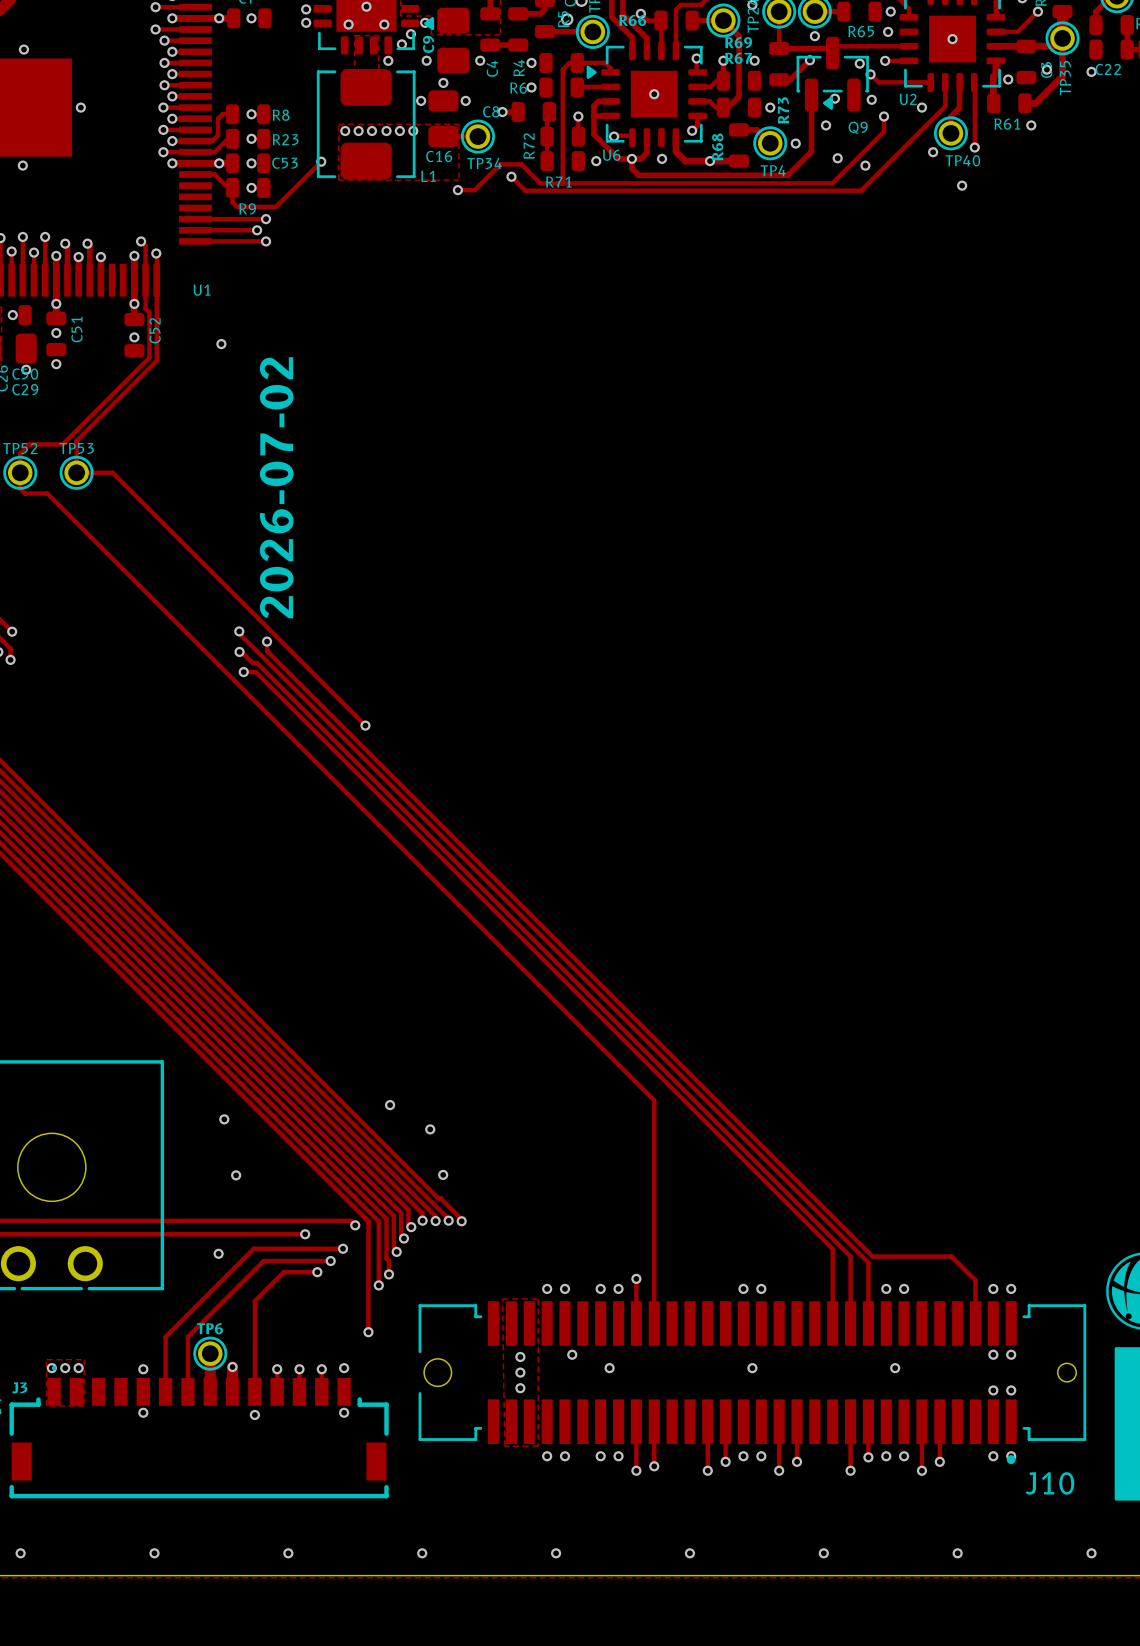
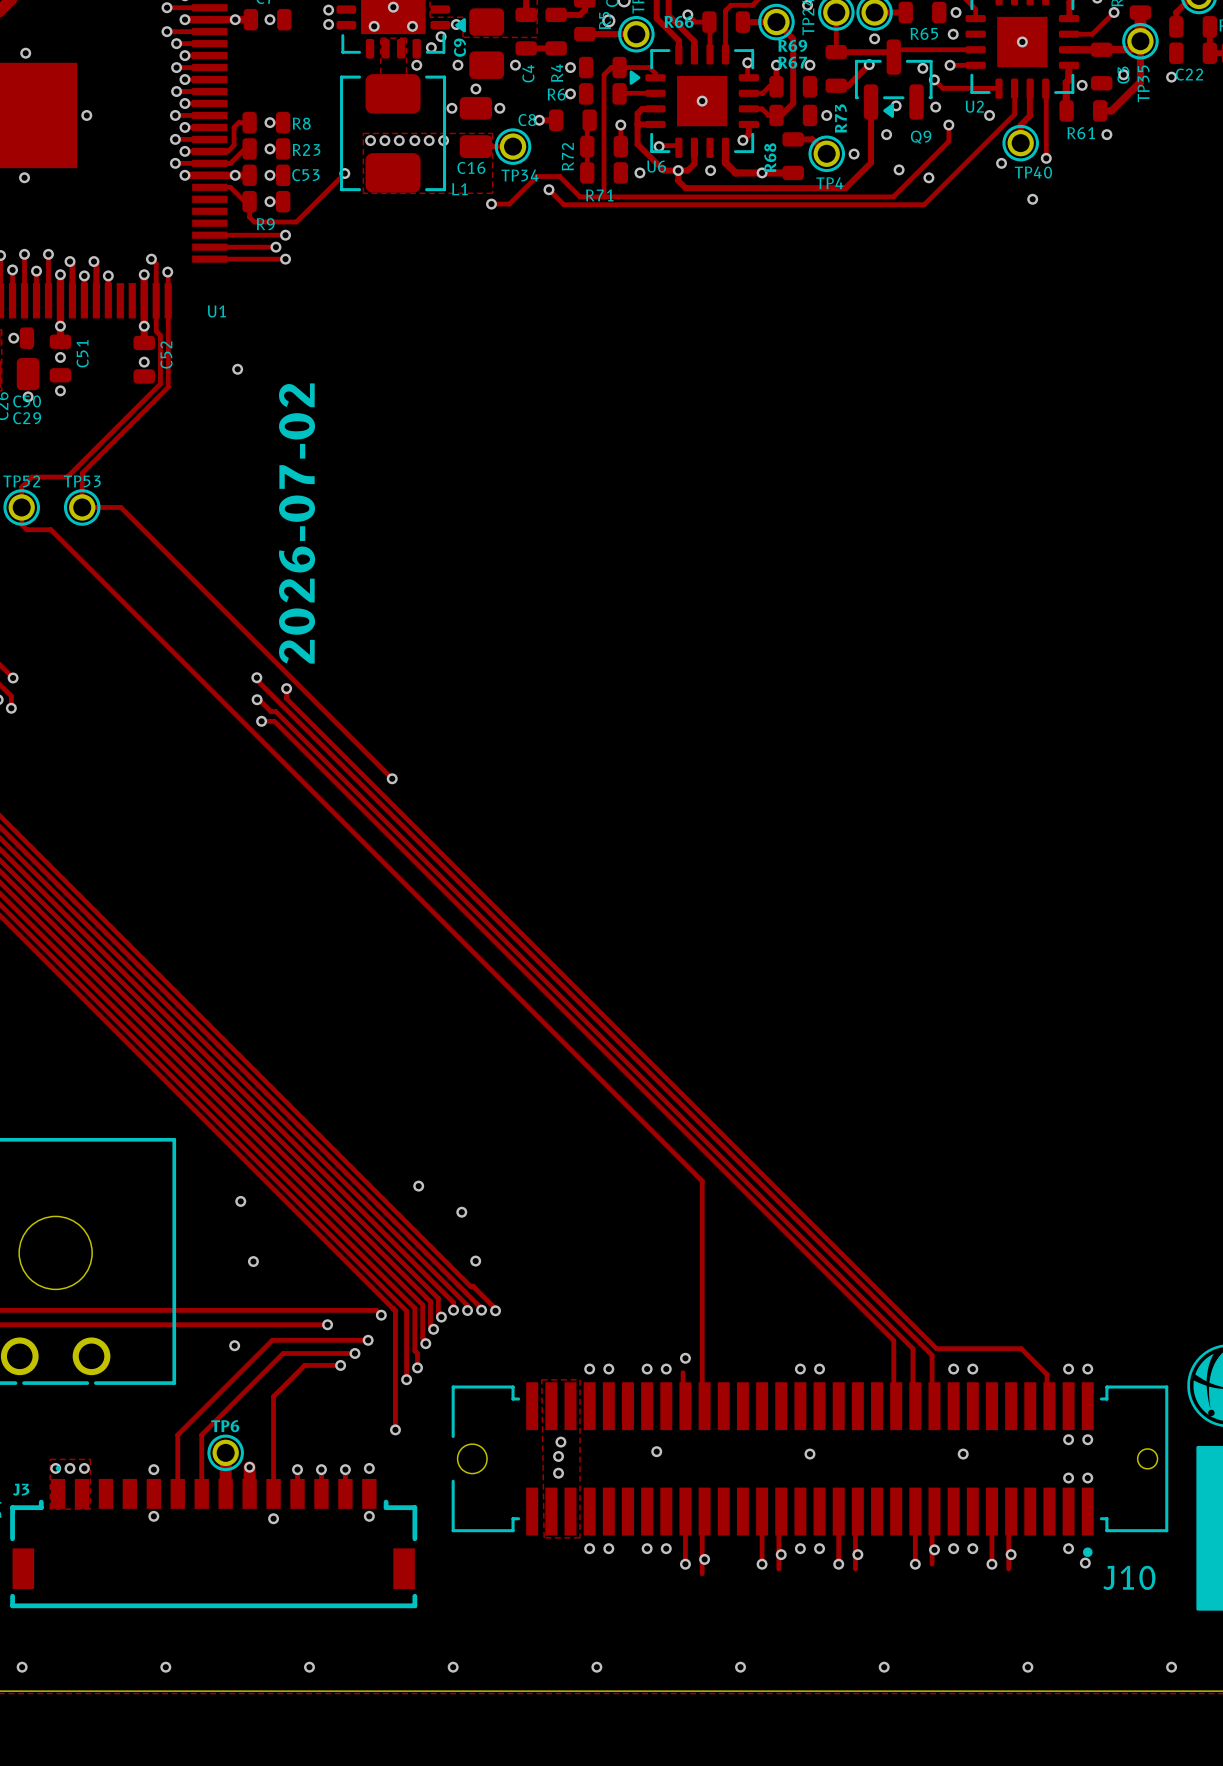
via: none -> (685, 1358)
via: none -> (589, 1369)
via: none -> (608, 1369)
via: none -> (647, 1369)
via: none -> (666, 1369)
via: none -> (800, 1369)
via: none -> (819, 1369)
via: none -> (953, 1369)
via: none -> (972, 1369)
via: none -> (1068, 1369)
via: none -> (1087, 1369)
via: (636, 1278) -> none
via: (547, 1288) -> none
via: (565, 1288) -> none
via: (600, 1288) -> none
via: (618, 1288) -> none
via: (743, 1288) -> none
via: (761, 1288) -> none
via: (886, 1288) -> none
via: (904, 1288) -> none
via: (993, 1288) -> none
via: (1011, 1288) -> none
zone outline: (502, 1298) (504, 1446) (538, 1446) (538, 1298) (502, 1298) -> (541, 1379) (544, 1537) (580, 1537) (580, 1379) (541, 1379)
via: none -> (1068, 1439)
via: none -> (1087, 1439)
via: none -> (560, 1442)
via: (572, 1354) -> none
via: (993, 1354) -> none
via: (1011, 1354) -> none
via position: (609, 1368) -> (656, 1451)
via position: (752, 1368) -> (809, 1454)
via position: (895, 1368) -> (963, 1454)
via: none -> (1068, 1478)
via: none -> (1087, 1478)
J10 position: (752, 1382) -> (809, 1469)
via: (520, 1388) -> none
via: (993, 1390) -> none
via: (1011, 1390) -> none
track: (636, 1421) (636, 1470) -> (685, 1511) (685, 1564)
track: (707, 1421) (707, 1470) -> (762, 1511) (762, 1564)
track: (779, 1421) (779, 1470) -> (838, 1511) (838, 1564)
track: (850, 1421) (850, 1470) -> (915, 1511) (915, 1564)
track: (921, 1421) (921, 1470) -> (991, 1511) (991, 1564)
via: none -> (589, 1548)
via: none -> (608, 1548)
via: none -> (647, 1548)
via: none -> (666, 1548)
via: none -> (800, 1548)
via: none -> (819, 1548)
via: none -> (953, 1548)
via: none -> (972, 1548)
via: none -> (934, 1549)
via: none -> (781, 1554)
via: none -> (857, 1554)
via: none -> (1011, 1554)
via: none -> (704, 1559)
via: (547, 1456) -> none
via: (565, 1456) -> none
via: (600, 1456) -> none
via: (618, 1456) -> none
via: (743, 1456) -> none
via: (761, 1456) -> none
via: (886, 1456) -> none
via: (904, 1456) -> none
via position: (993, 1456) -> (1068, 1548)
via: none -> (685, 1564)
via: none -> (762, 1564)
via: none -> (838, 1564)
via: none -> (915, 1564)
via: (868, 1457) -> none
via: none -> (991, 1564)
via: (725, 1461) -> none
via: (797, 1461) -> none
via: (939, 1461) -> none
via: (654, 1466) -> none
via: (636, 1470) -> none
via: (707, 1470) -> none
via: (779, 1470) -> none
via: (850, 1470) -> none
via: (921, 1470) -> none

